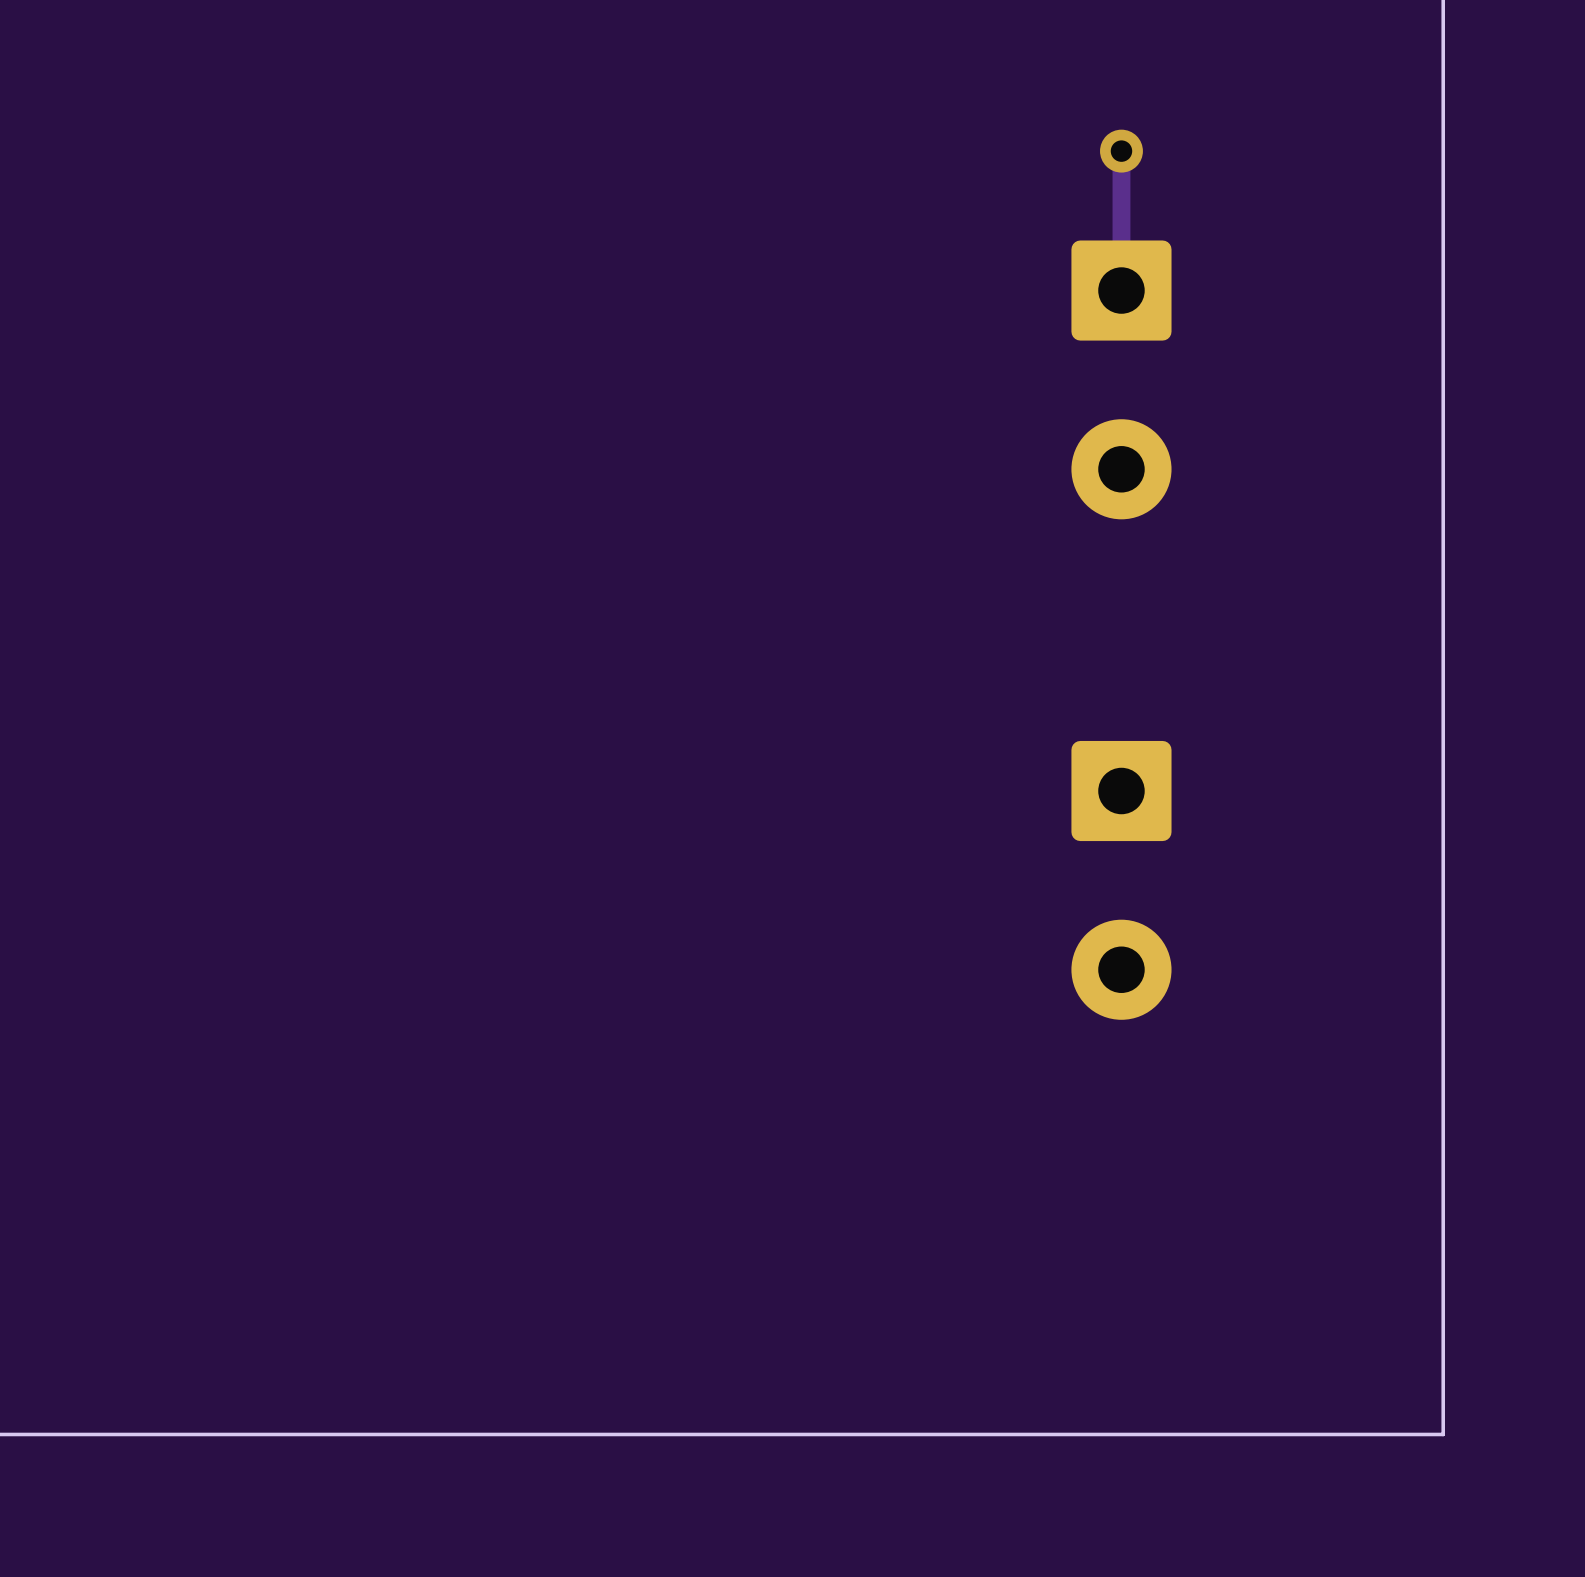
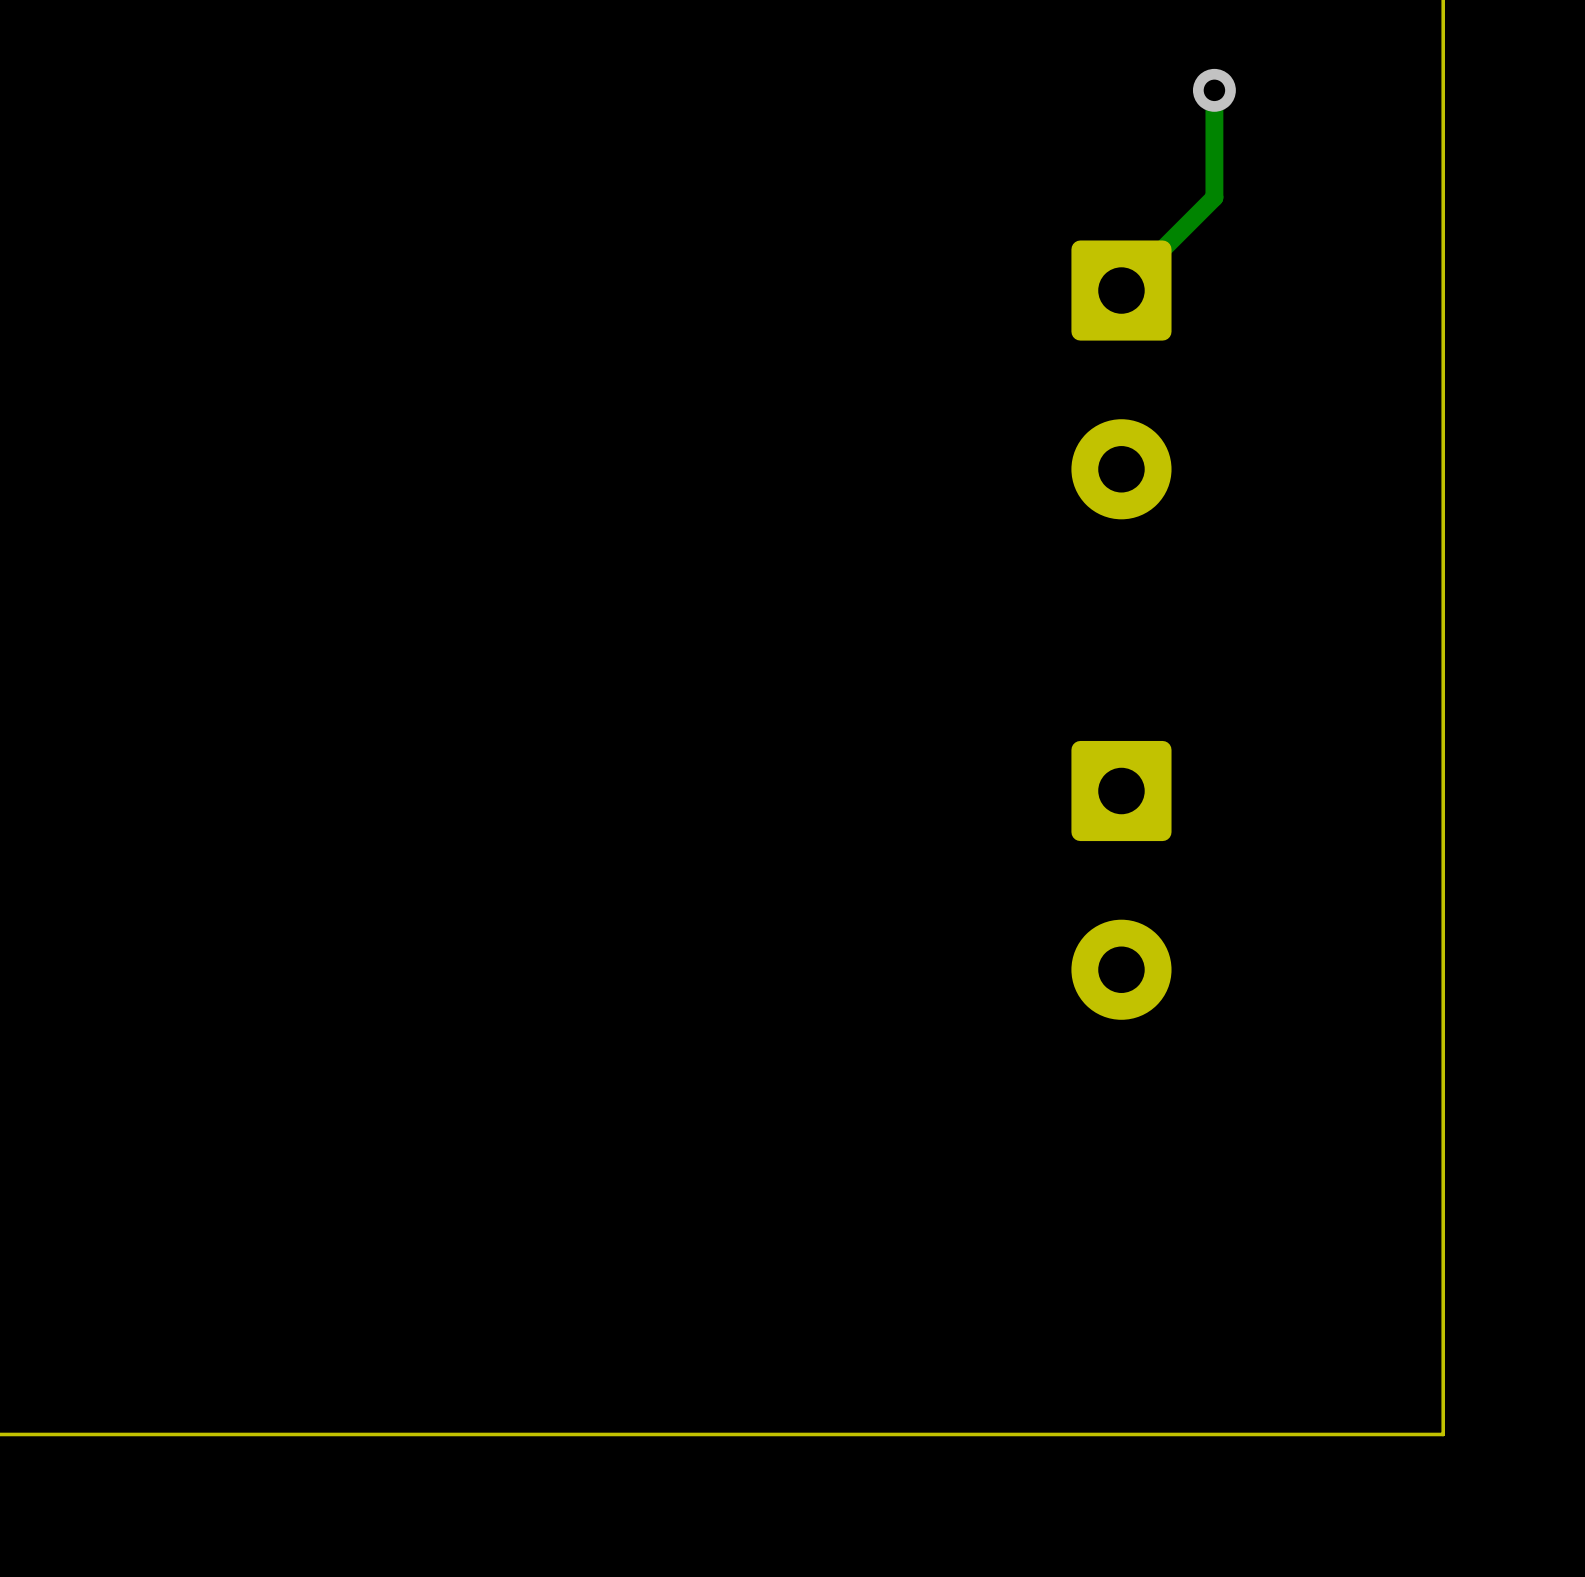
track: (1121, 151) (1121, 290) -> (1214, 90) (1214, 197) (1121, 290)
via position: (1121, 151) -> (1214, 90)

